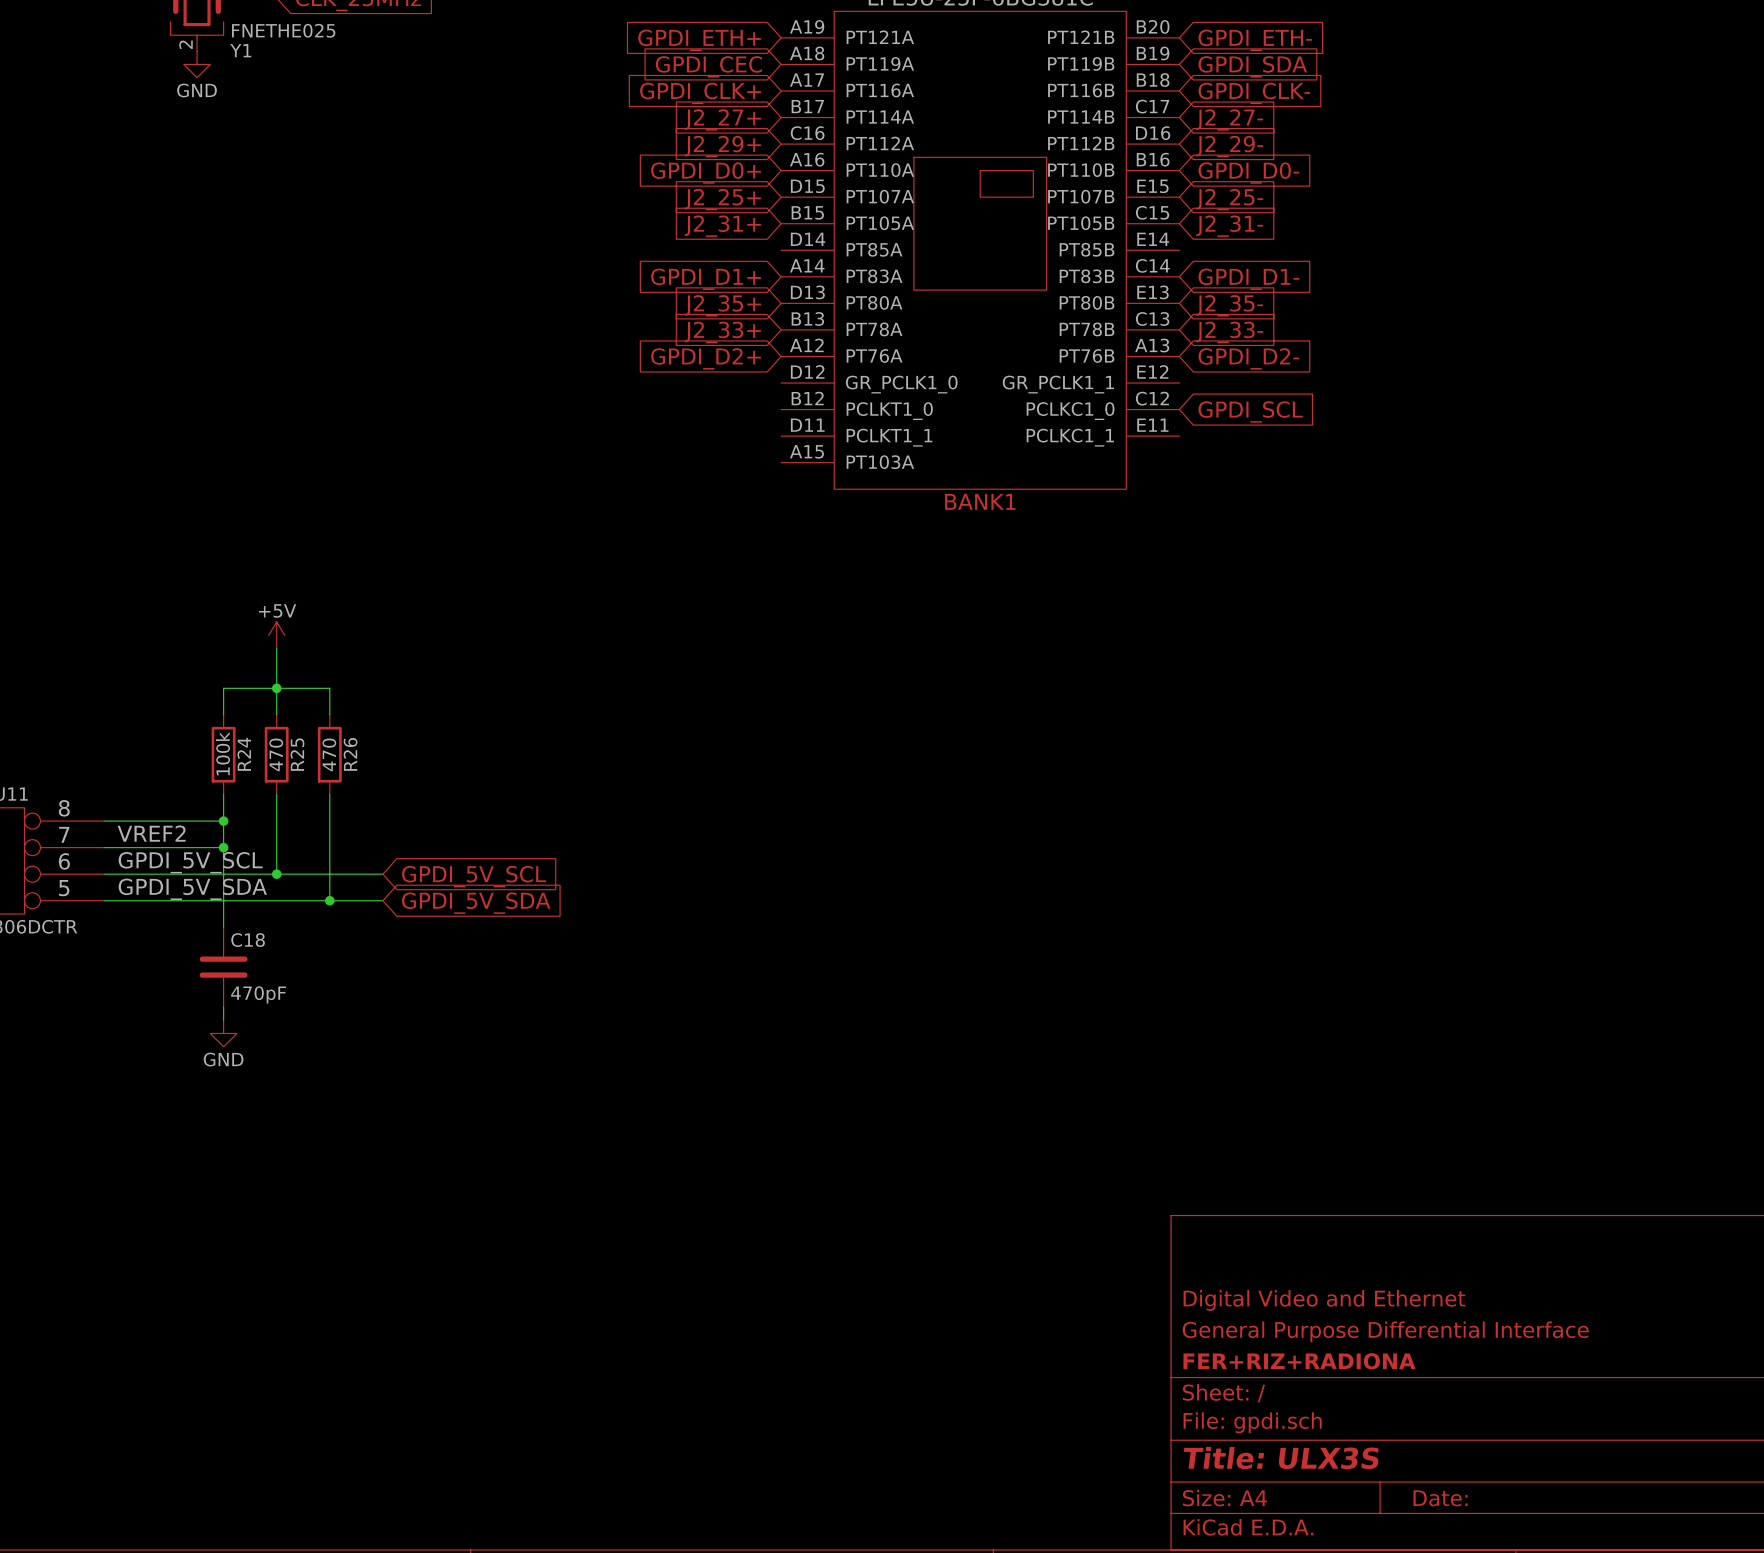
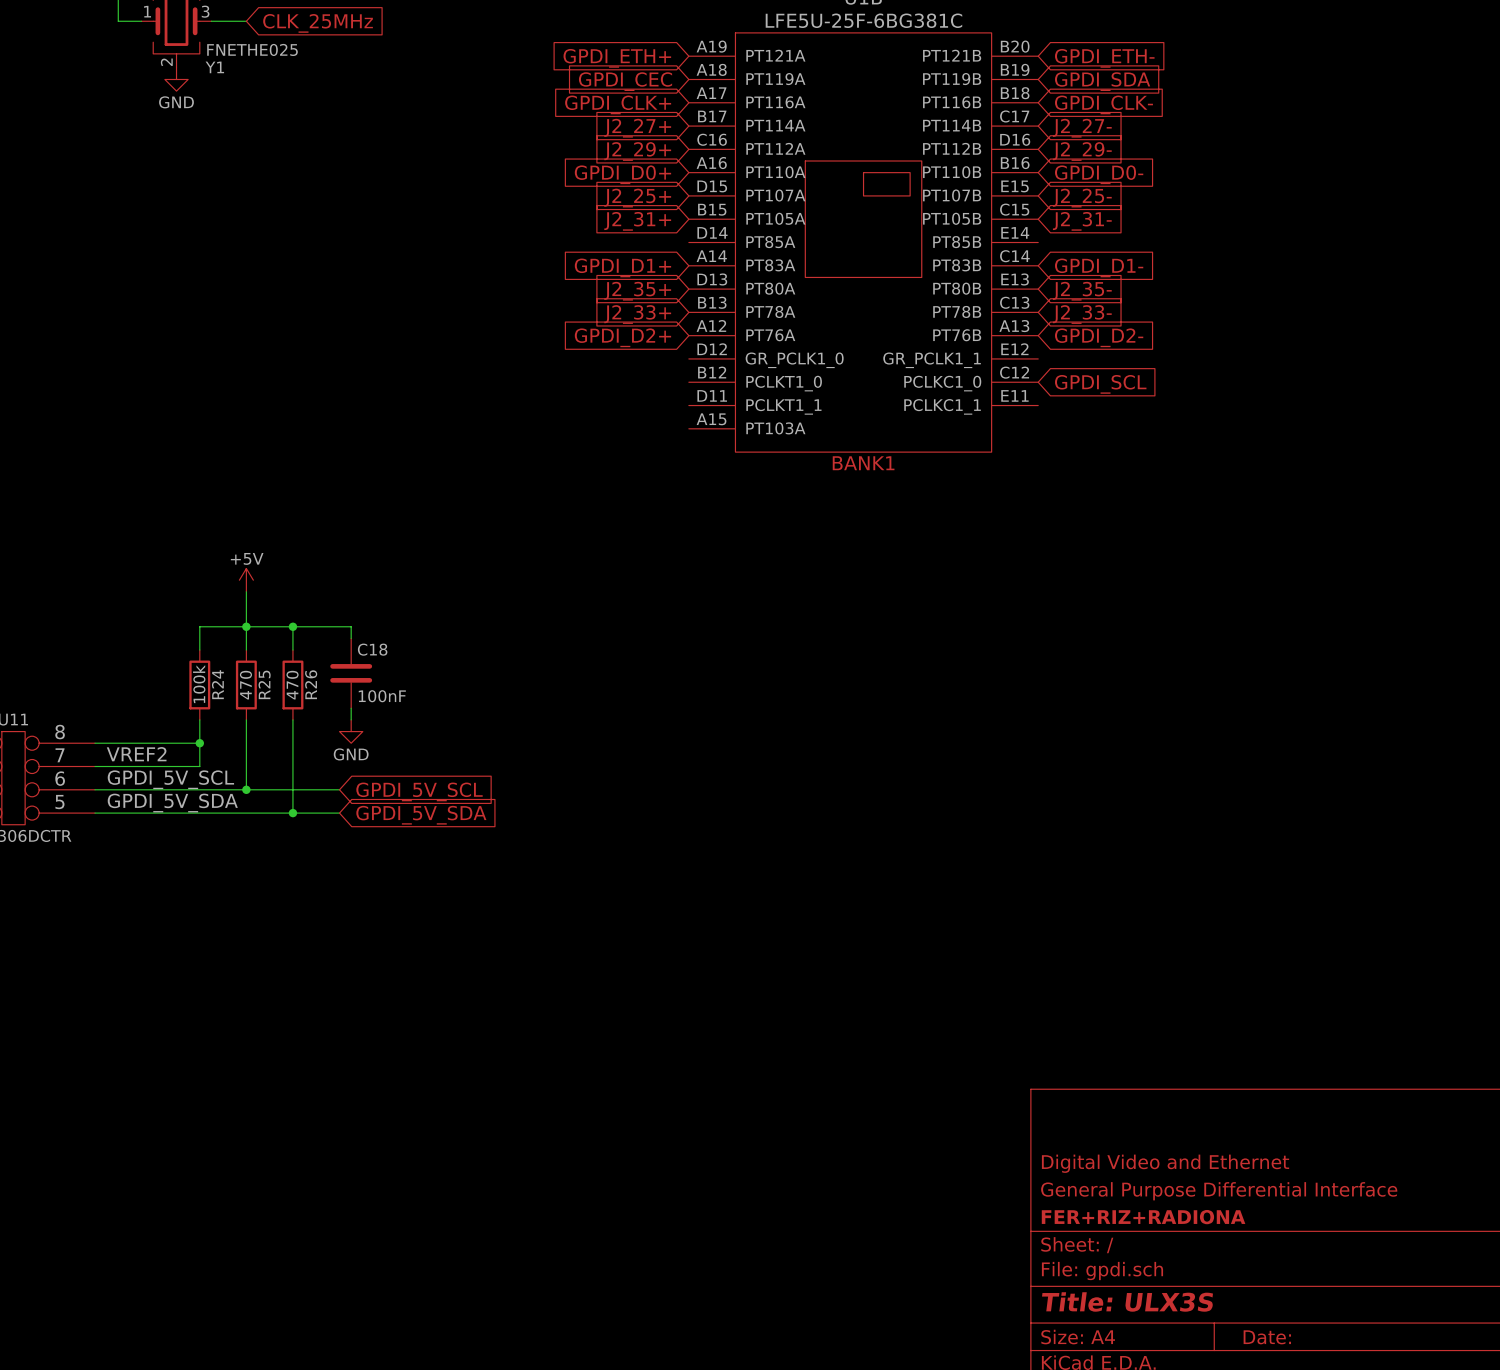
wire: none -> (292, 626) (351, 626) (351, 638)
junction: none -> (292, 626)
wire: none -> (351, 708) (351, 719)
power symbol: none -> GND (351, 731)
wire: (223, 847) (223, 927) -> none
junction: (223, 847) -> none
C18 position: (223, 967) -> (351, 673)
C18 value: 470pF (258, 994) -> 100nF (382, 696)
wire: (223, 1006) (223, 1020) -> none
power symbol: GND (223, 1033) -> none

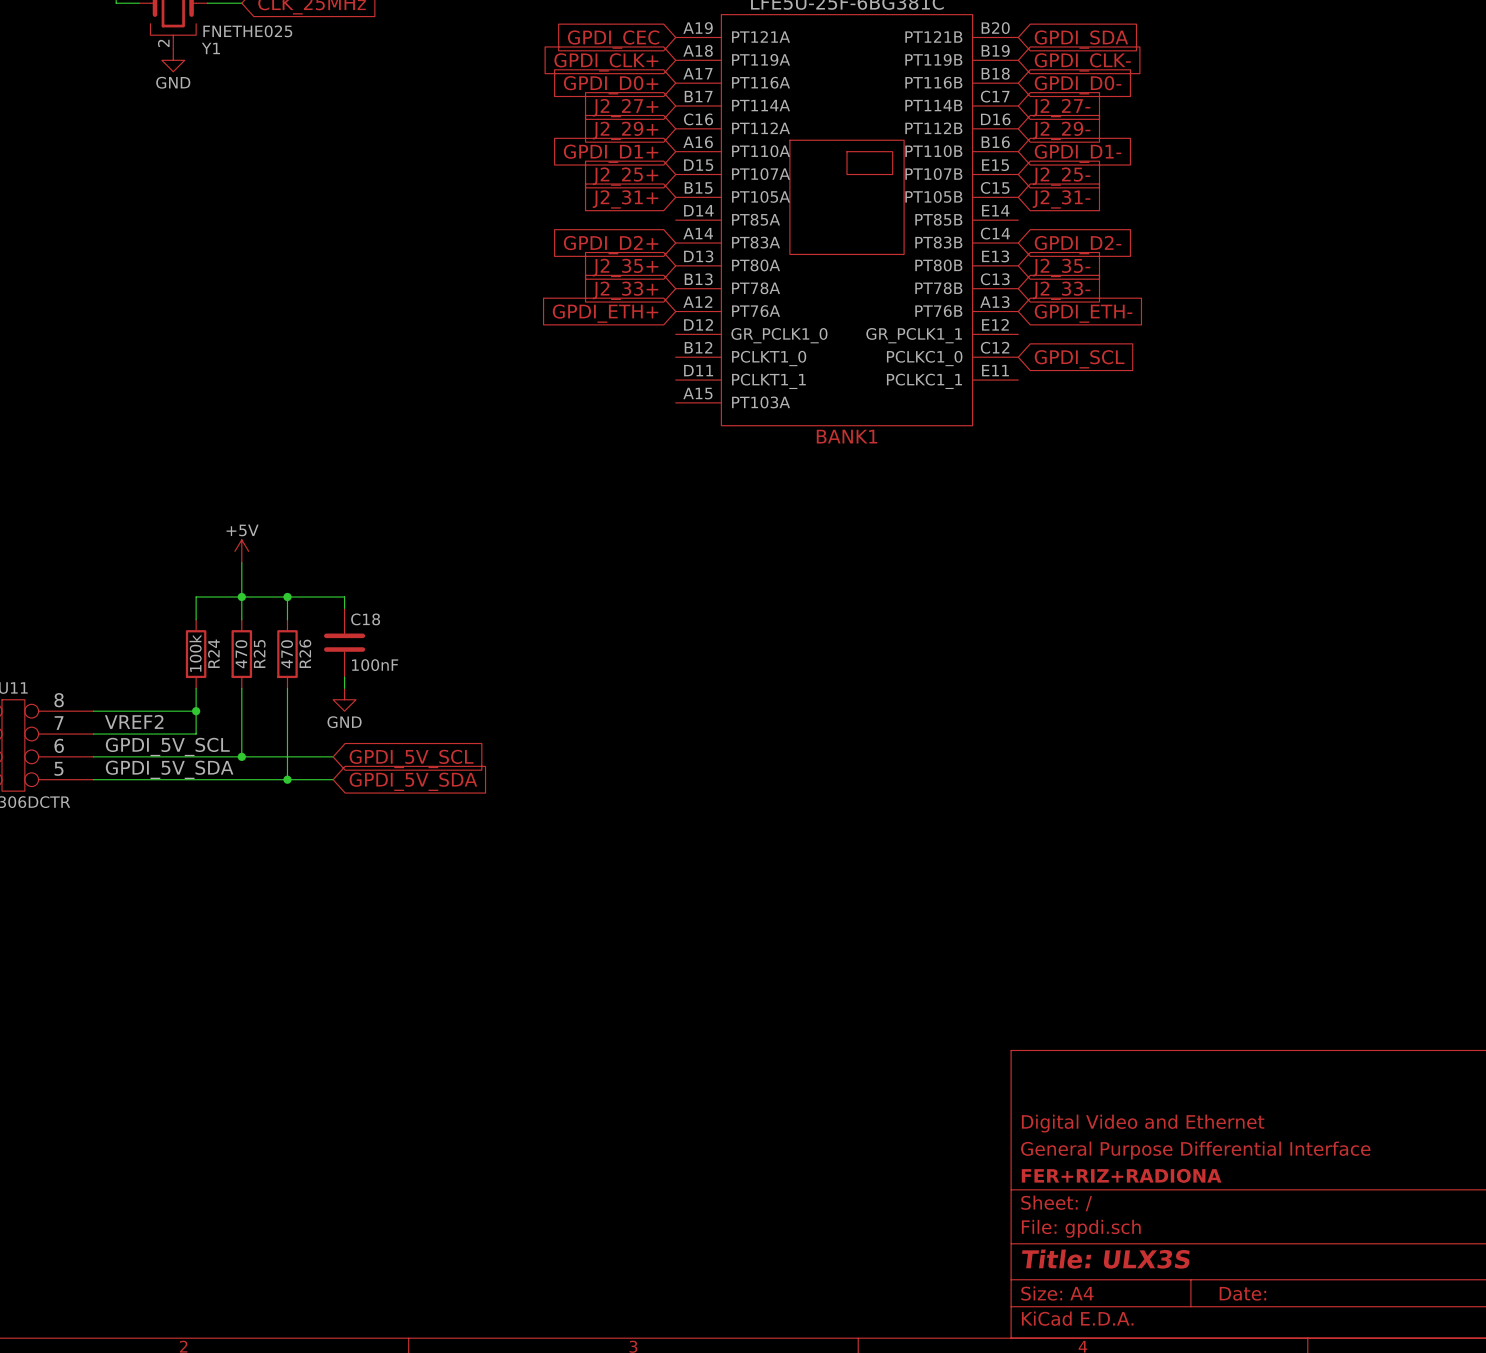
global label: GPDI_ETH+ (617, 58) -> GPDI_CEC (613, 39)
global label: GPDI_ETH- (1104, 58) -> GPDI_SDA (1081, 39)
global label: GPDI_CEC (625, 81) -> GPDI_CLK+ (606, 62)
global label: GPDI_SDA (1102, 81) -> GPDI_CLK- (1082, 62)
global label: GPDI_CLK+ (618, 104) -> GPDI_D0+ (611, 85)
global label: GPDI_CLK- (1103, 104) -> GPDI_D0- (1078, 85)
global label: GPDI_D0+ (622, 174) -> GPDI_D1+ (611, 153)
global label: GPDI_D0- (1099, 174) -> GPDI_D1- (1078, 153)
global label: GPDI_D1+ (622, 267) -> GPDI_D2+ (611, 245)
global label: GPDI_D1- (1099, 267) -> GPDI_D2- (1078, 245)
global label: GPDI_D2+ (622, 337) -> GPDI_ETH+ (605, 313)
global label: GPDI_D2- (1099, 337) -> GPDI_ETH- (1083, 313)

